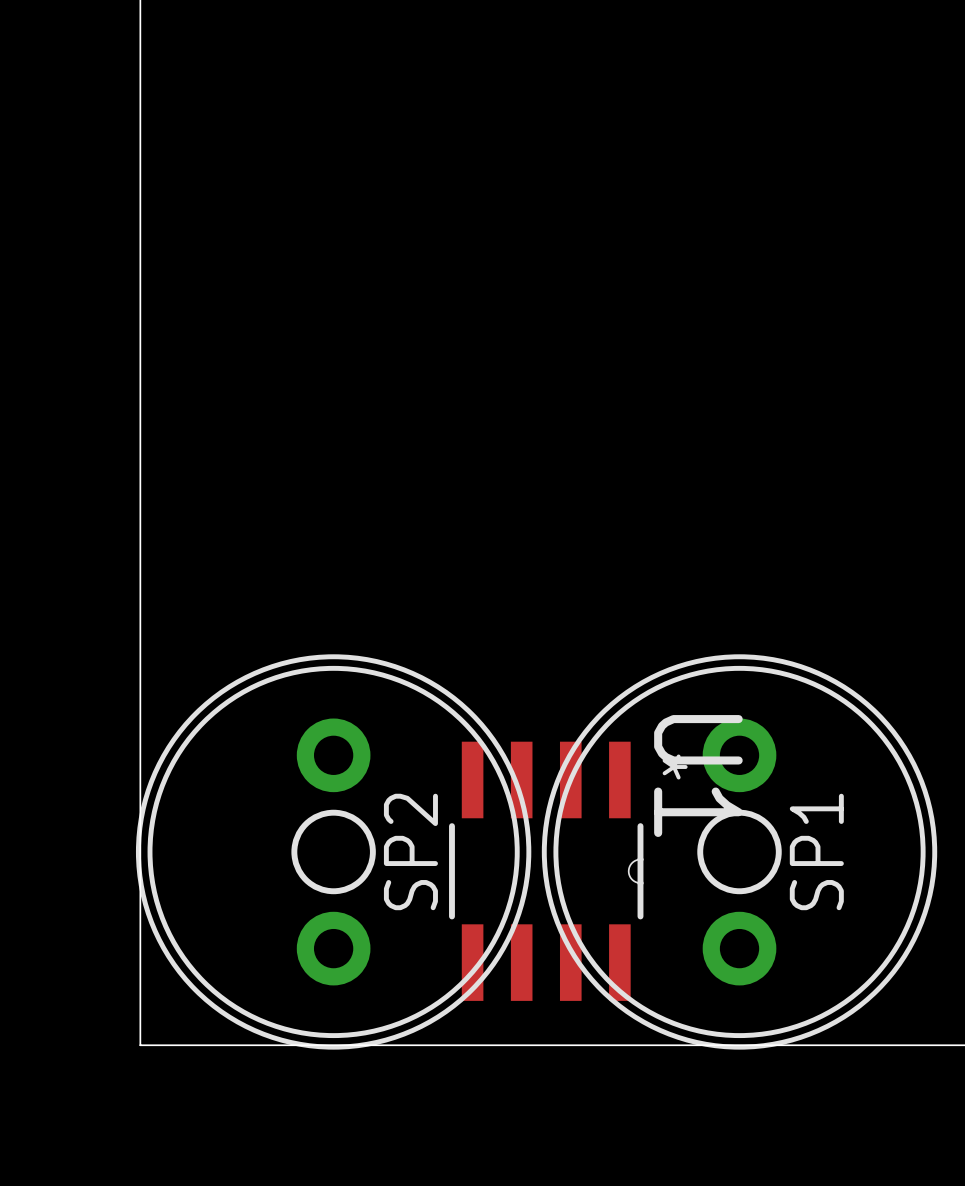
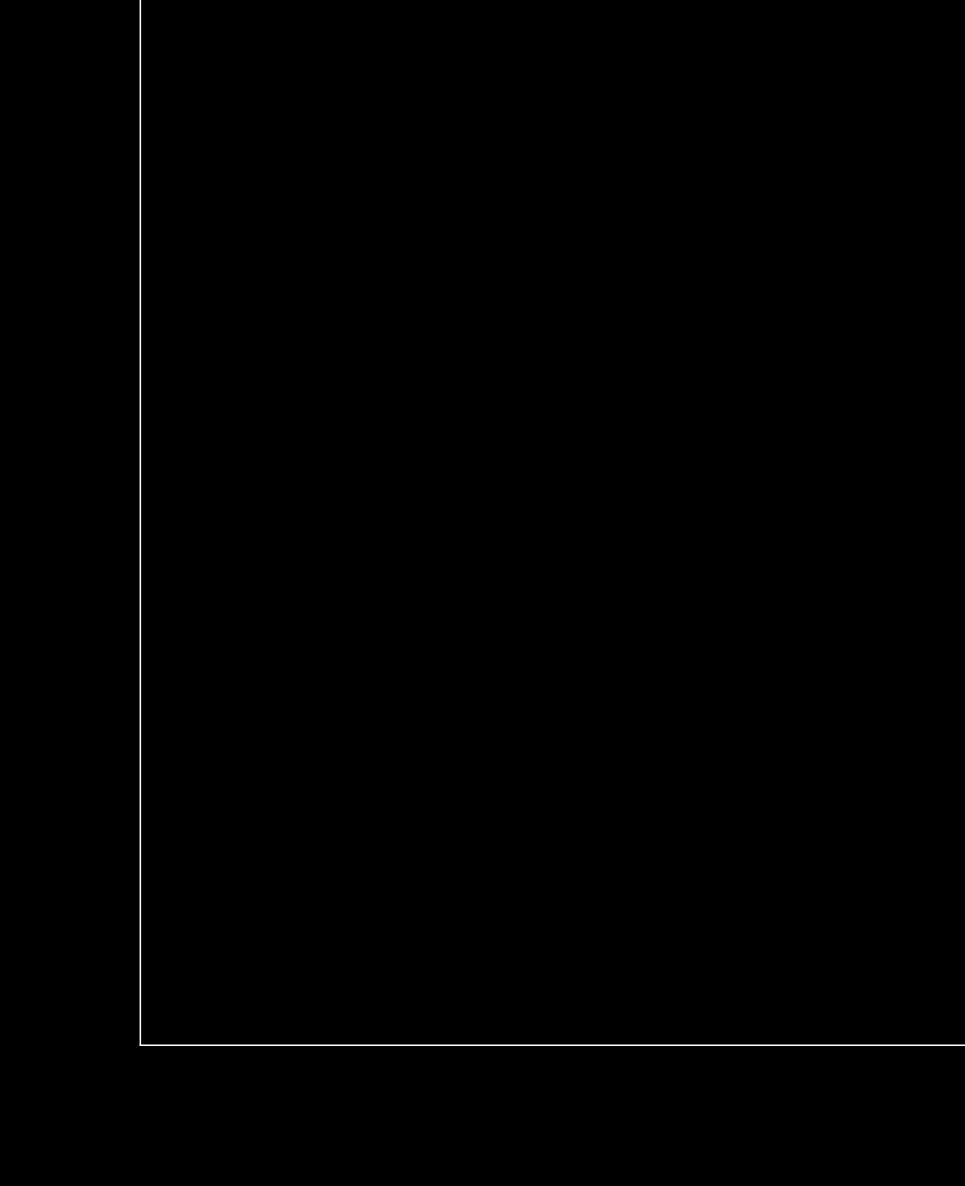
SP2: (333, 851) -> none
SP1: (739, 851) -> none
U1: (546, 871) -> none

